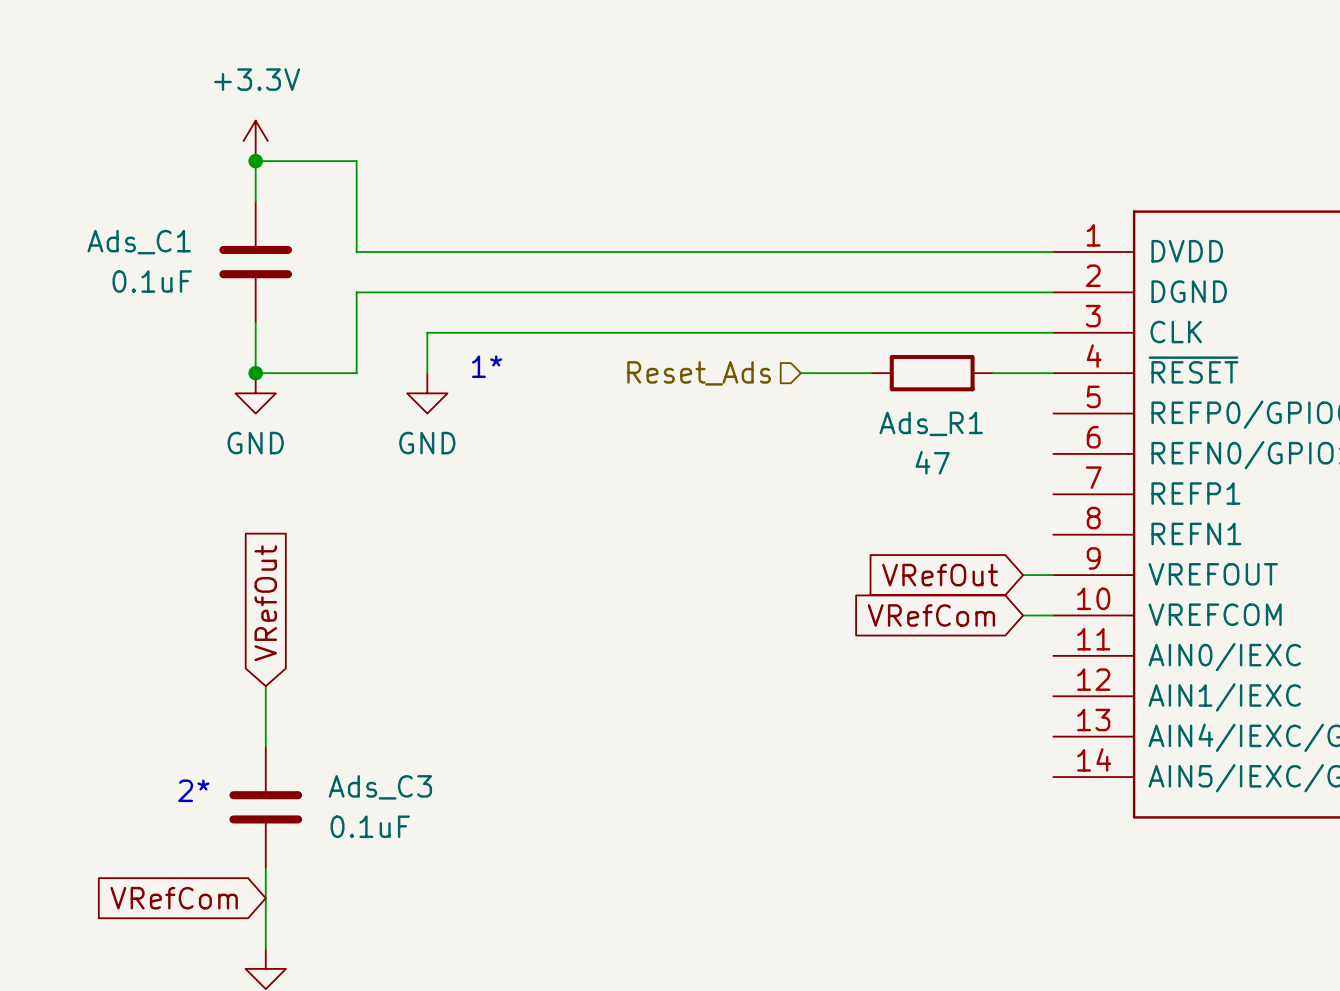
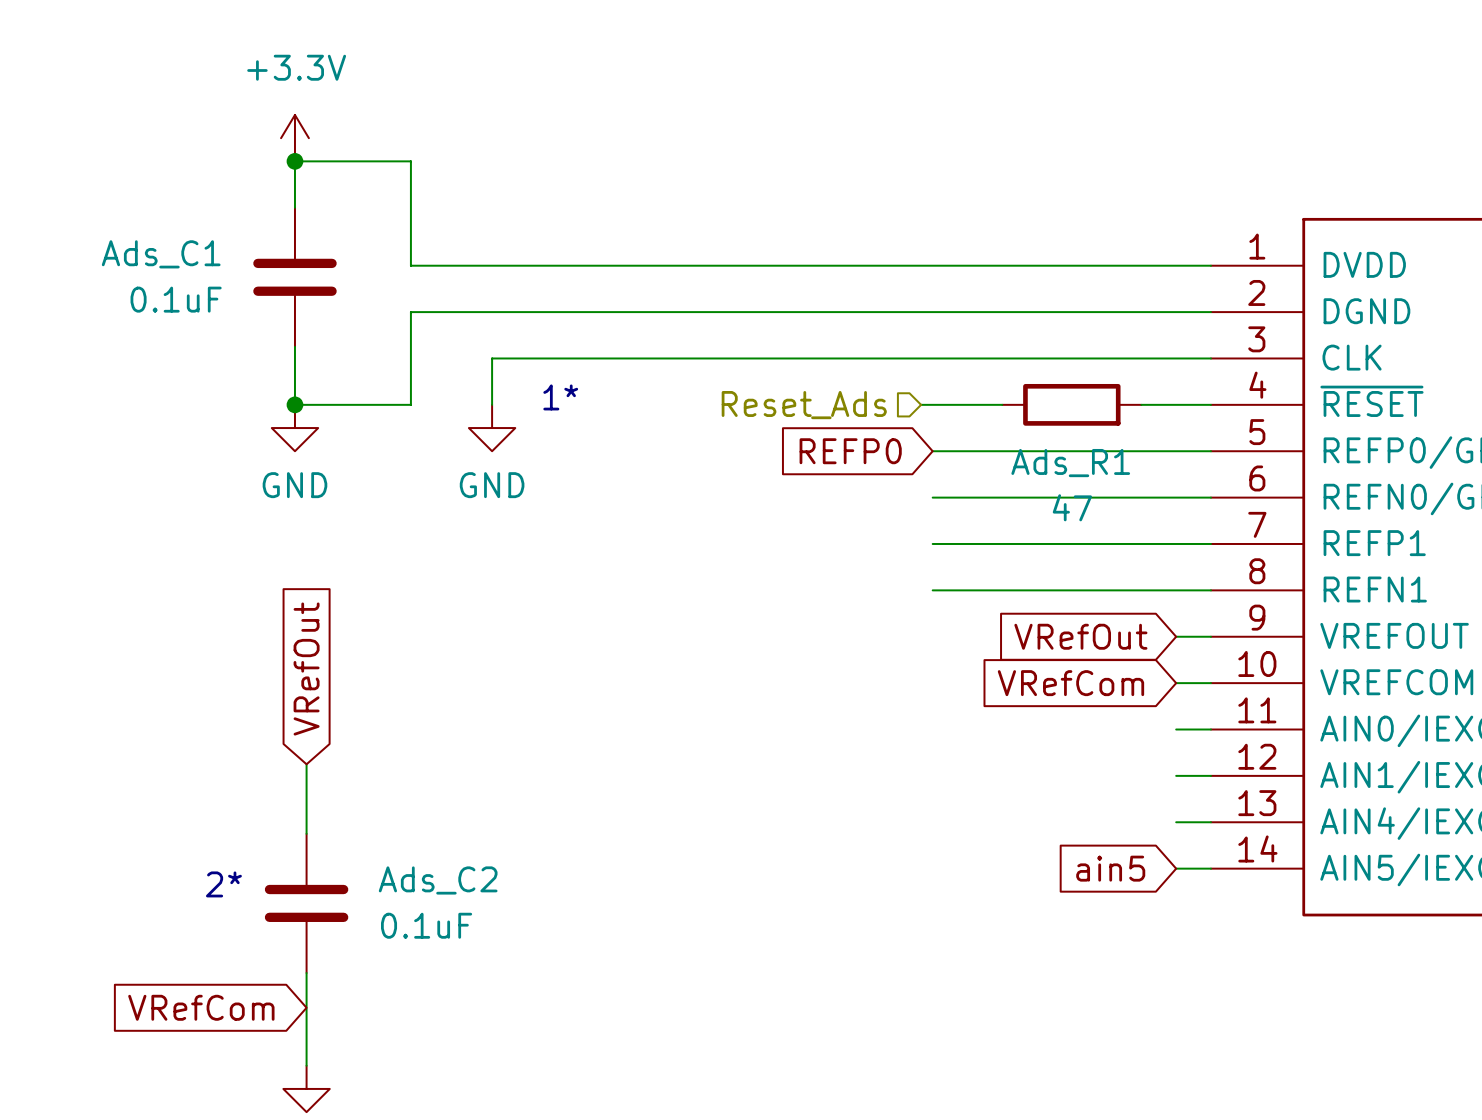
global label: none -> REFP0 (850, 451)
wire: none -> (932, 451) (1210, 451)
wire: none -> (932, 497) (1210, 497)
wire: none -> (932, 543) (1210, 543)
wire: none -> (932, 590) (1210, 590)
wire: none -> (1176, 729) (1210, 729)
wire: none -> (1176, 775) (1210, 775)
wire: none -> (1176, 822) (1210, 822)
global label: none -> ain5 (1110, 868)
wire: none -> (1176, 868) (1210, 868)
Ads_C3 name: Ads_C3 (380, 787) -> Ads_C2 (438, 880)

